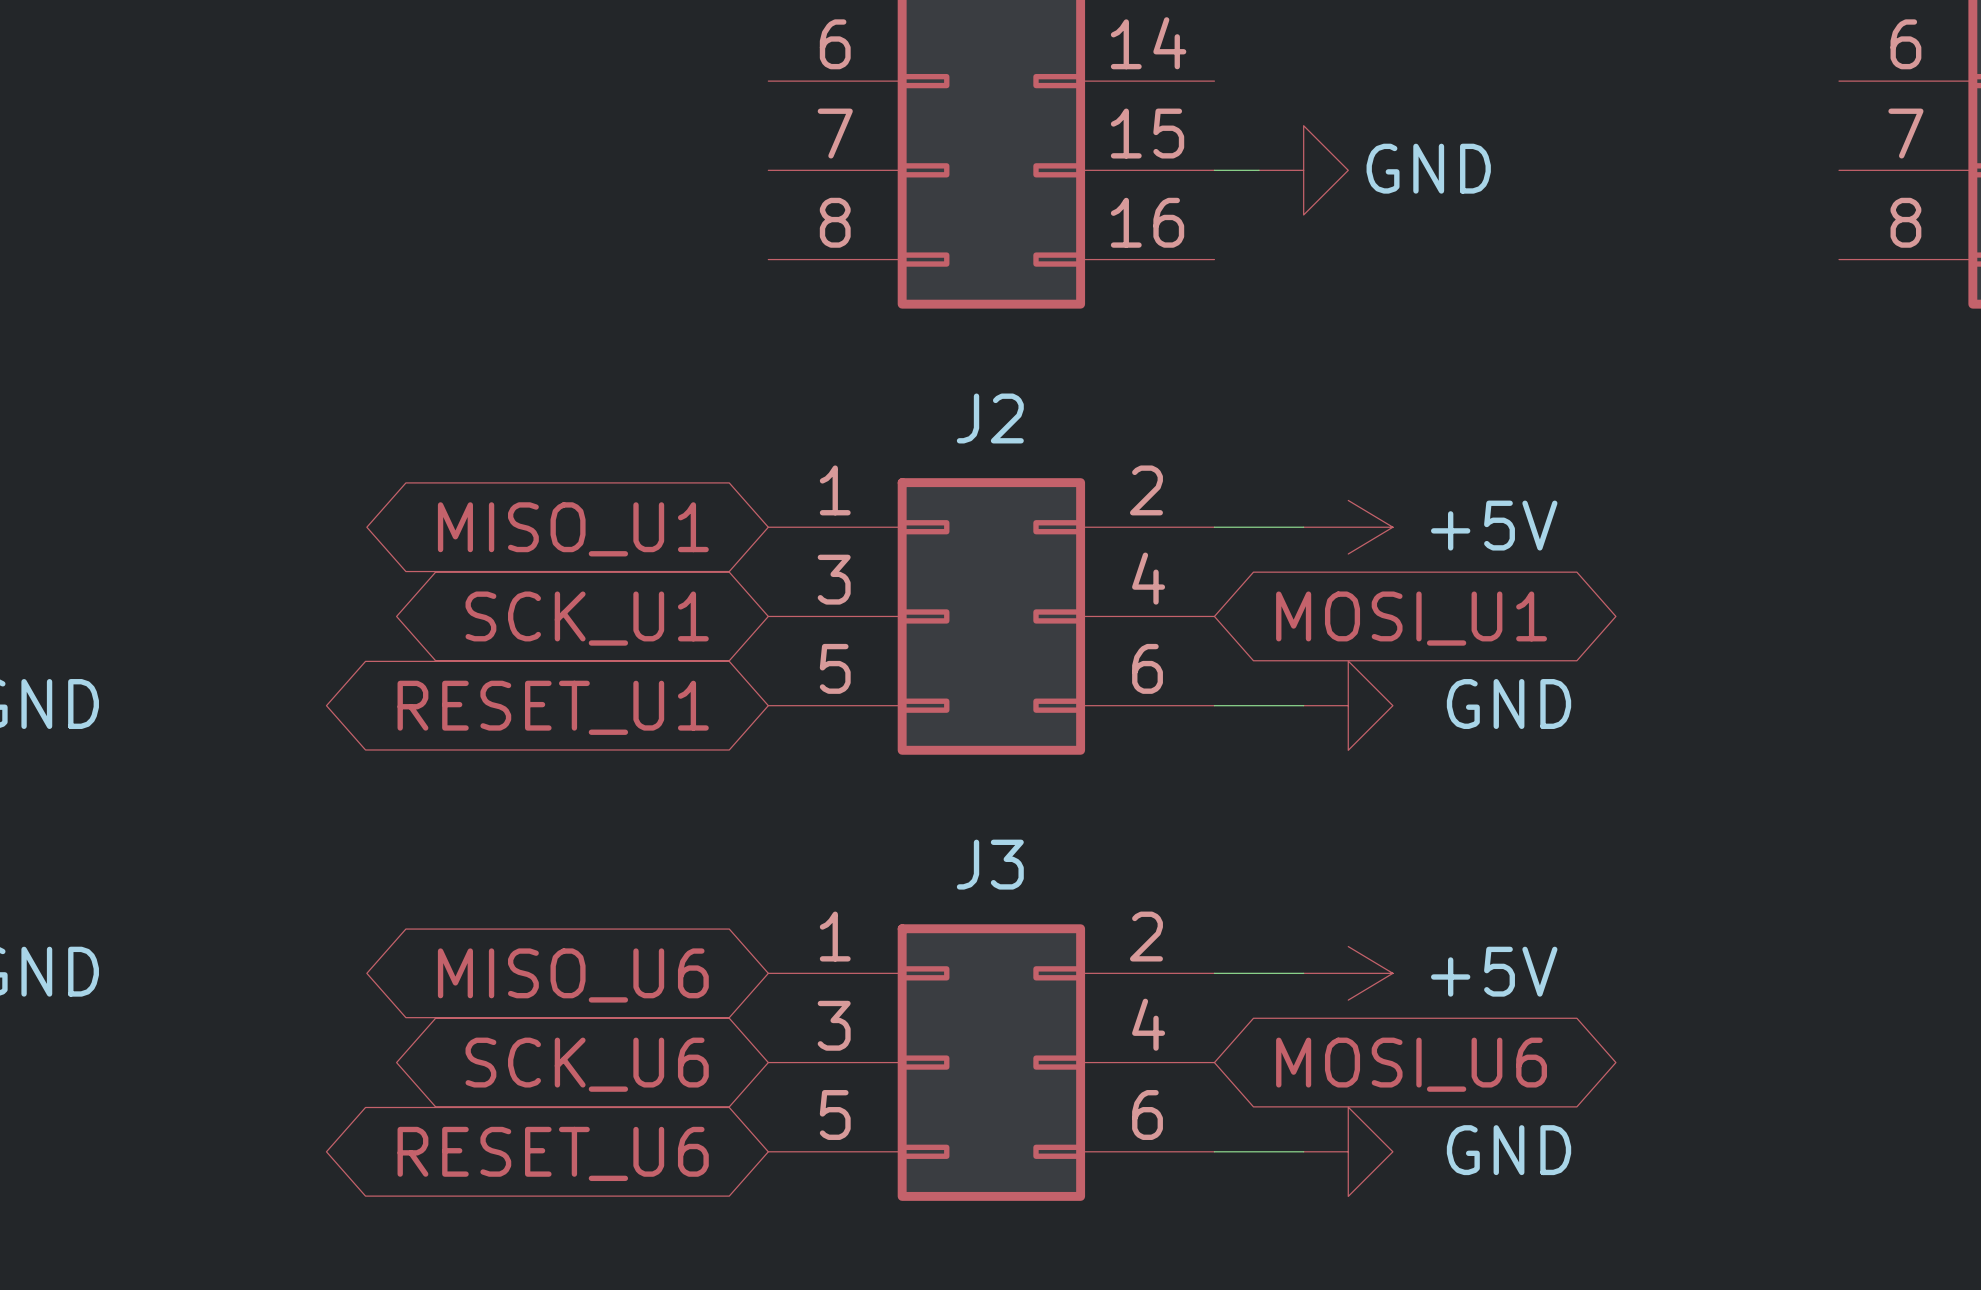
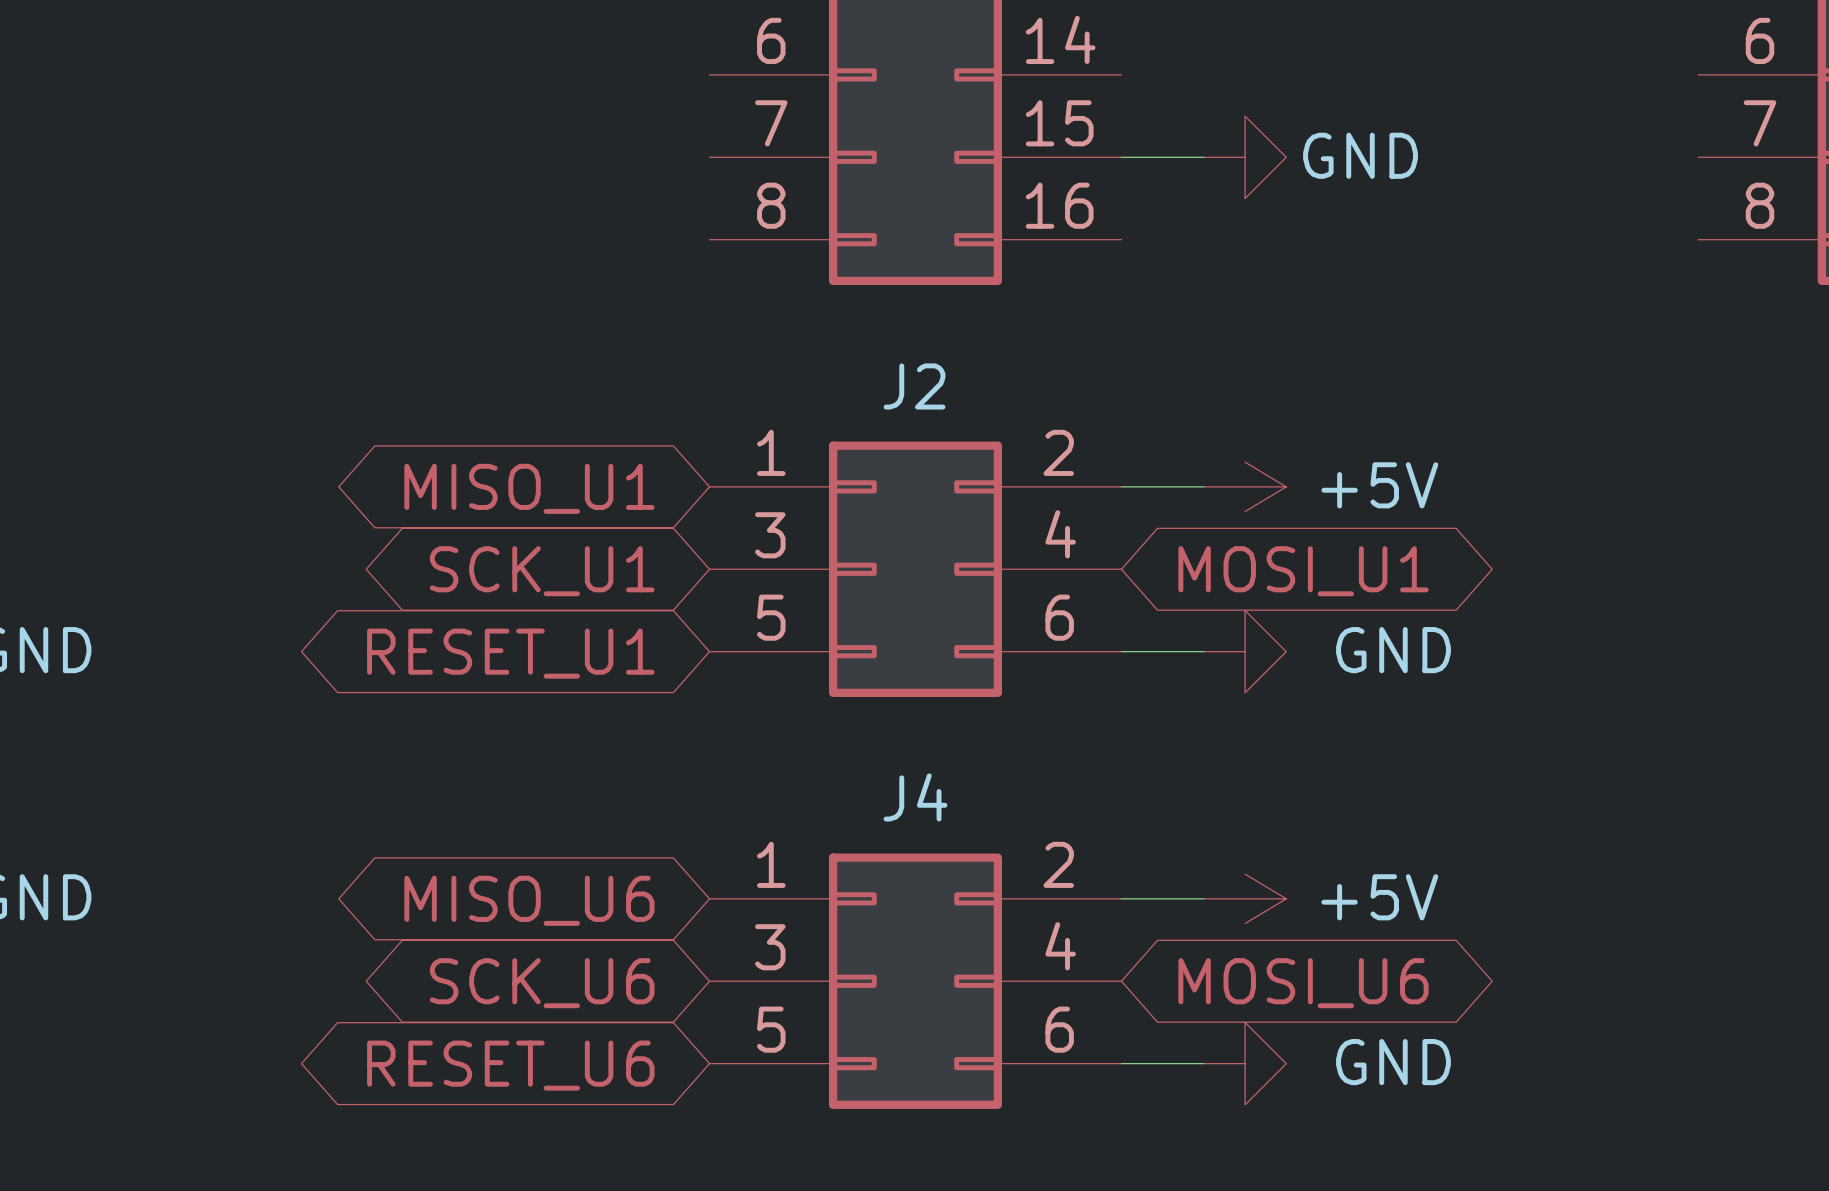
power symbol position: GND (1303, 170) -> GND (1245, 157)
J3 name: J3 (990, 864) -> J4 (915, 797)

